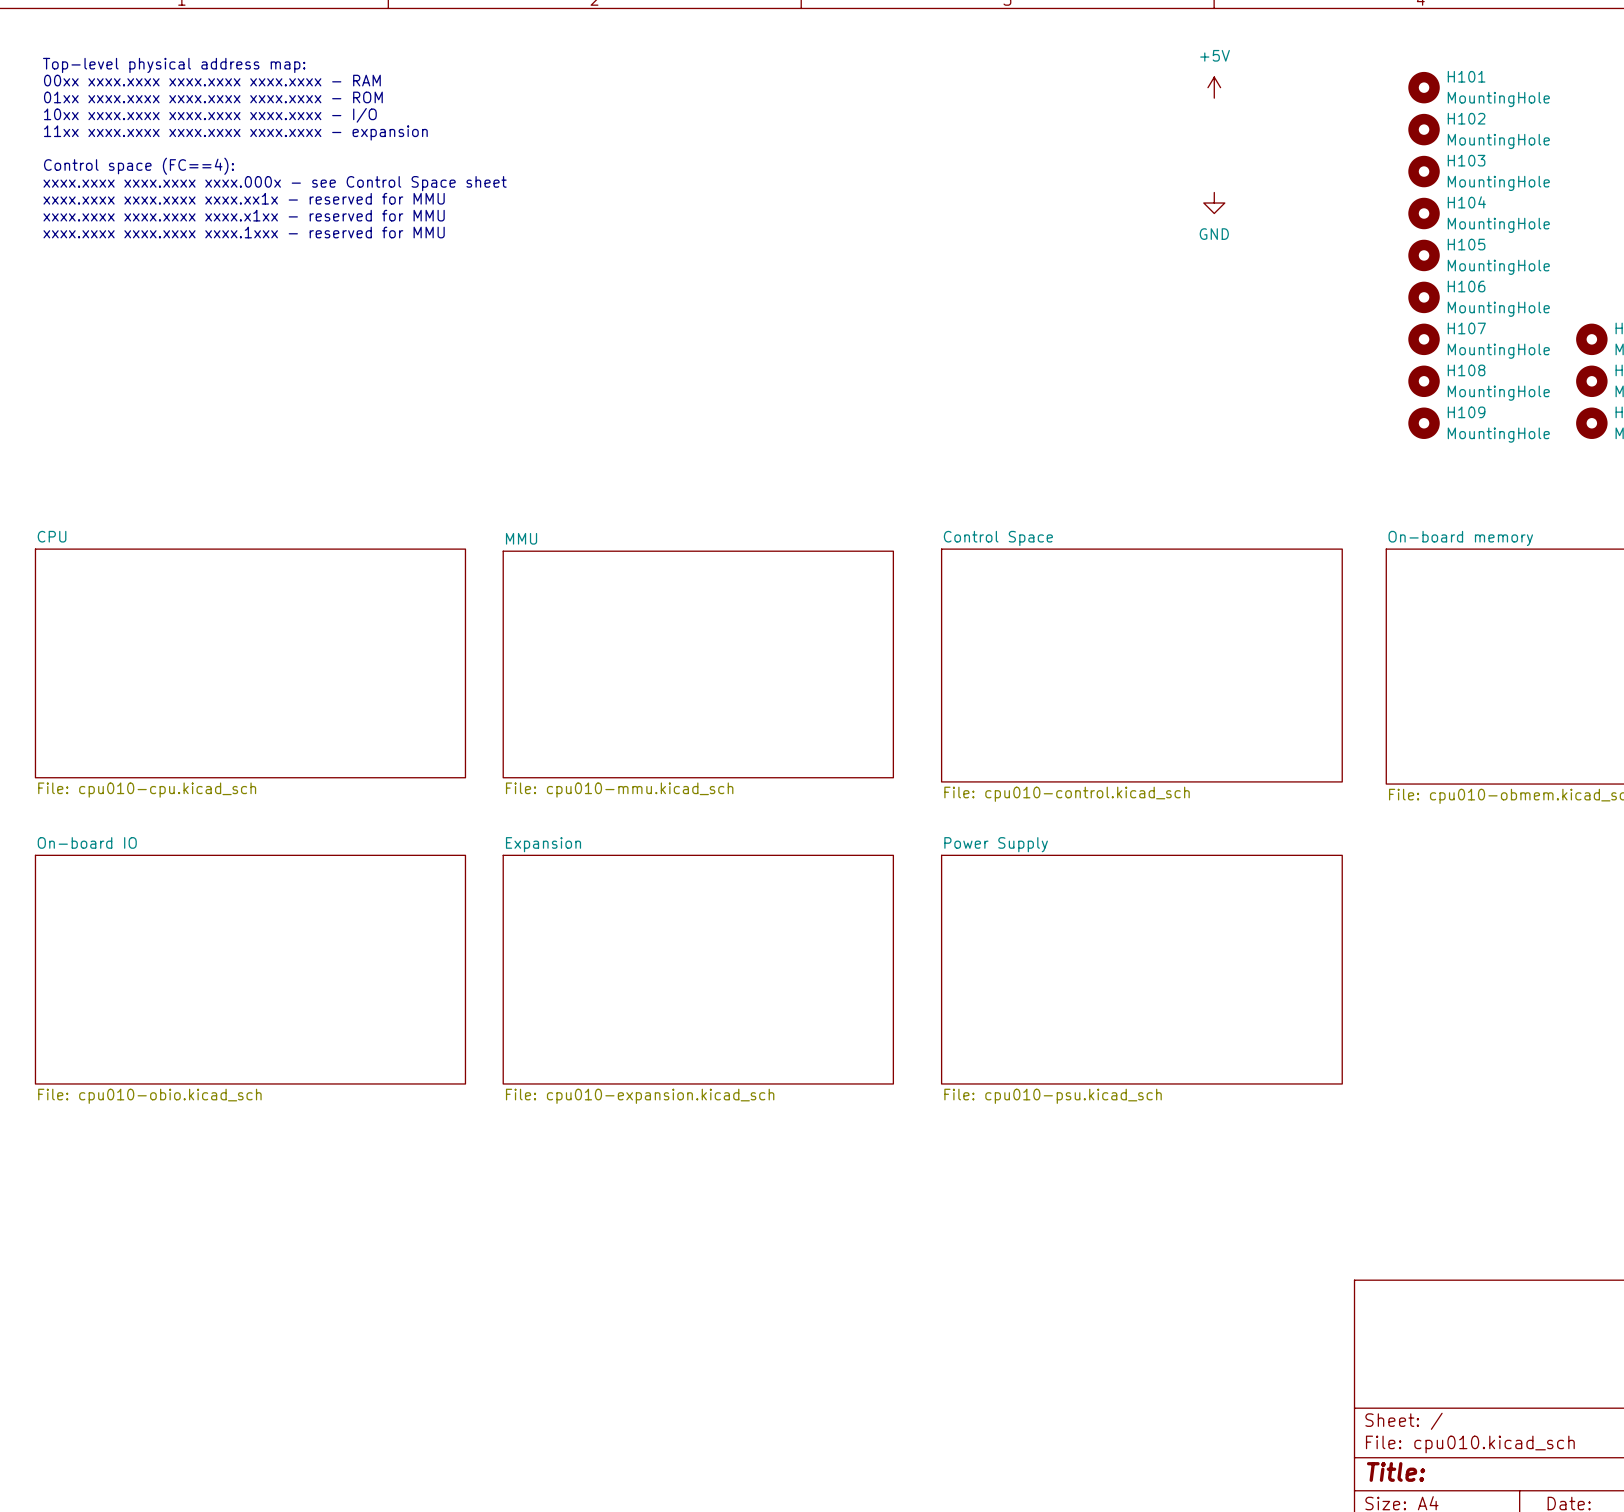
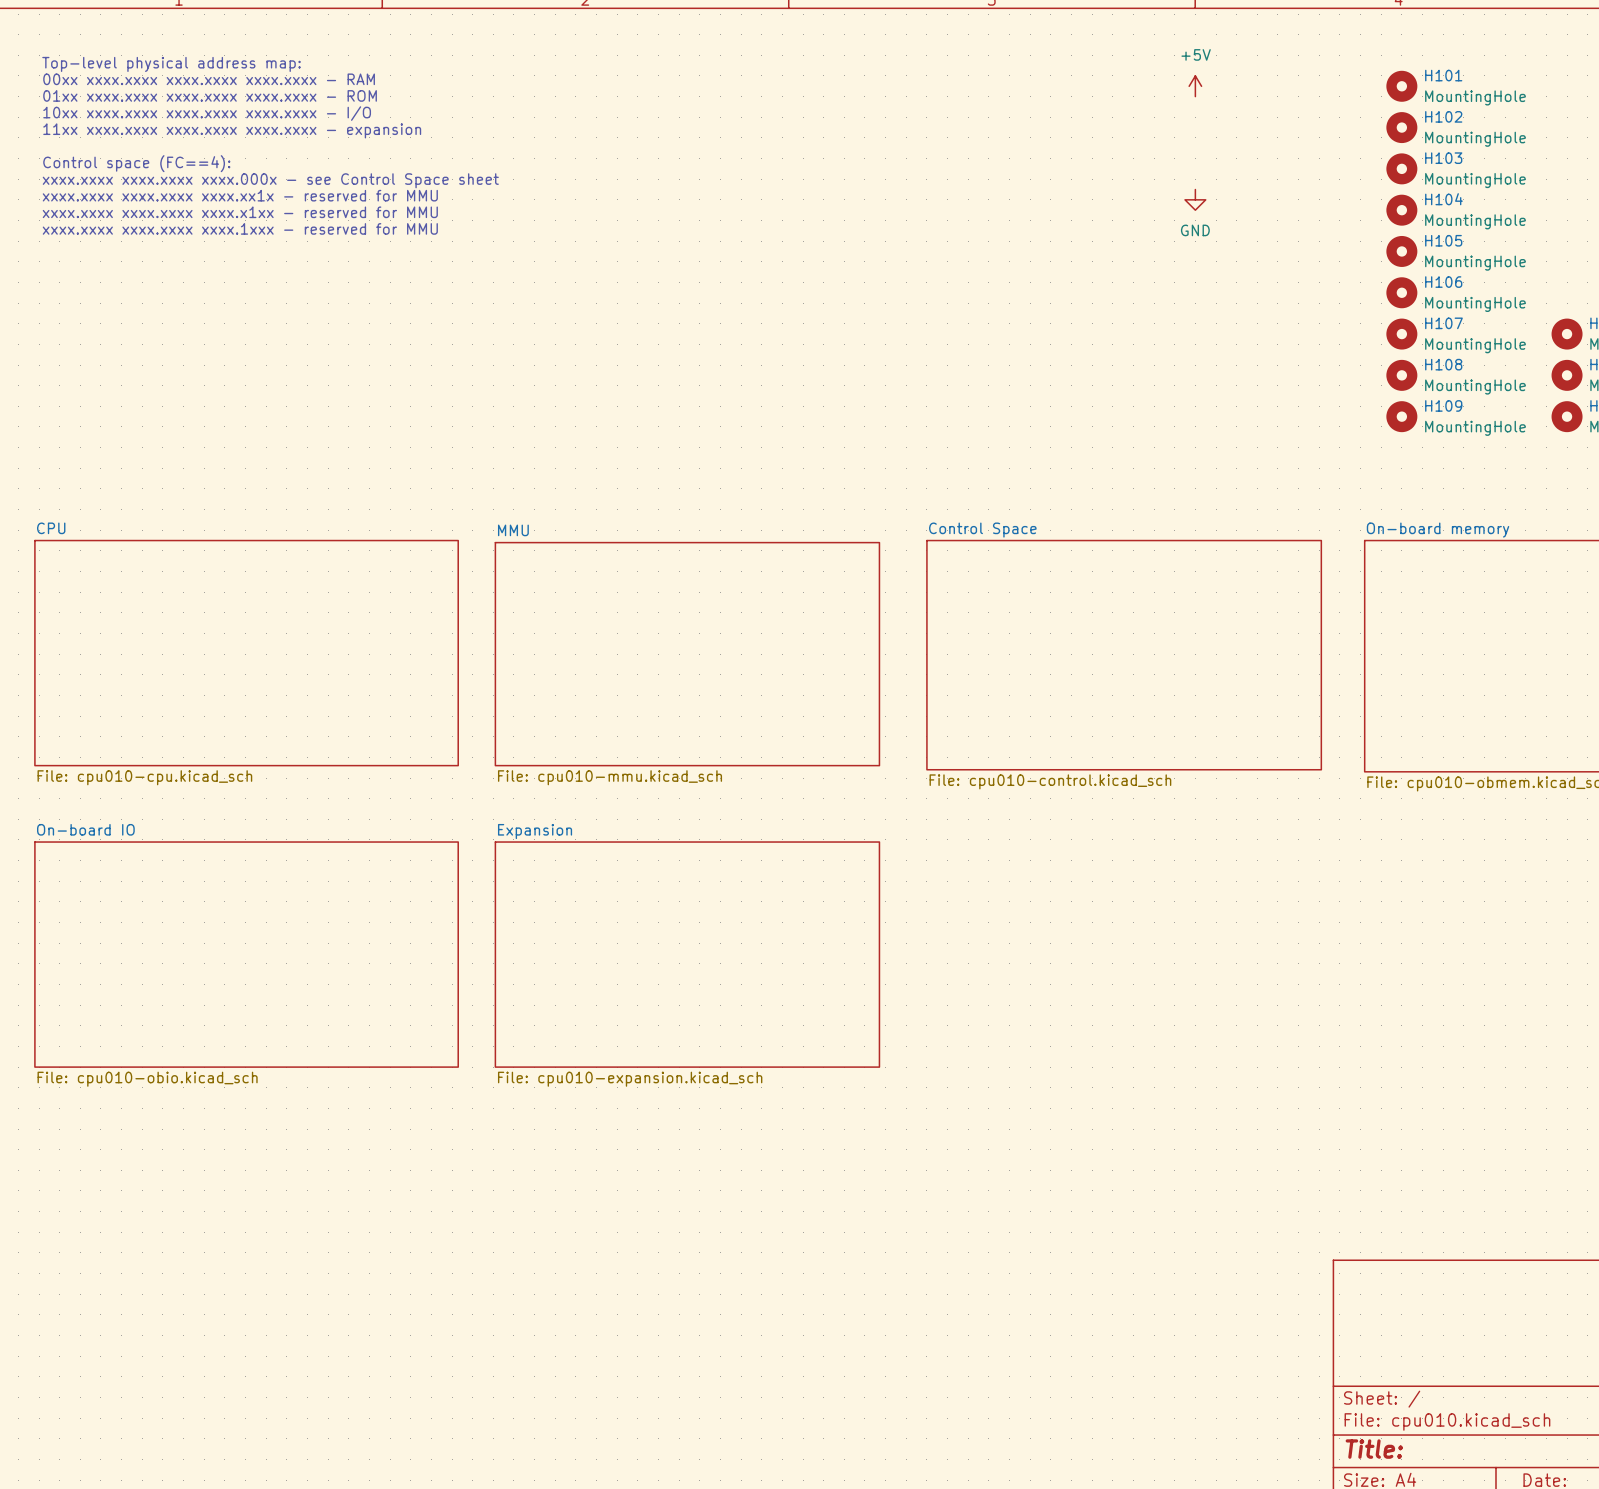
sheet Power Supply: File: cpu010-psu.kicad_sch (1141, 969) -> none

